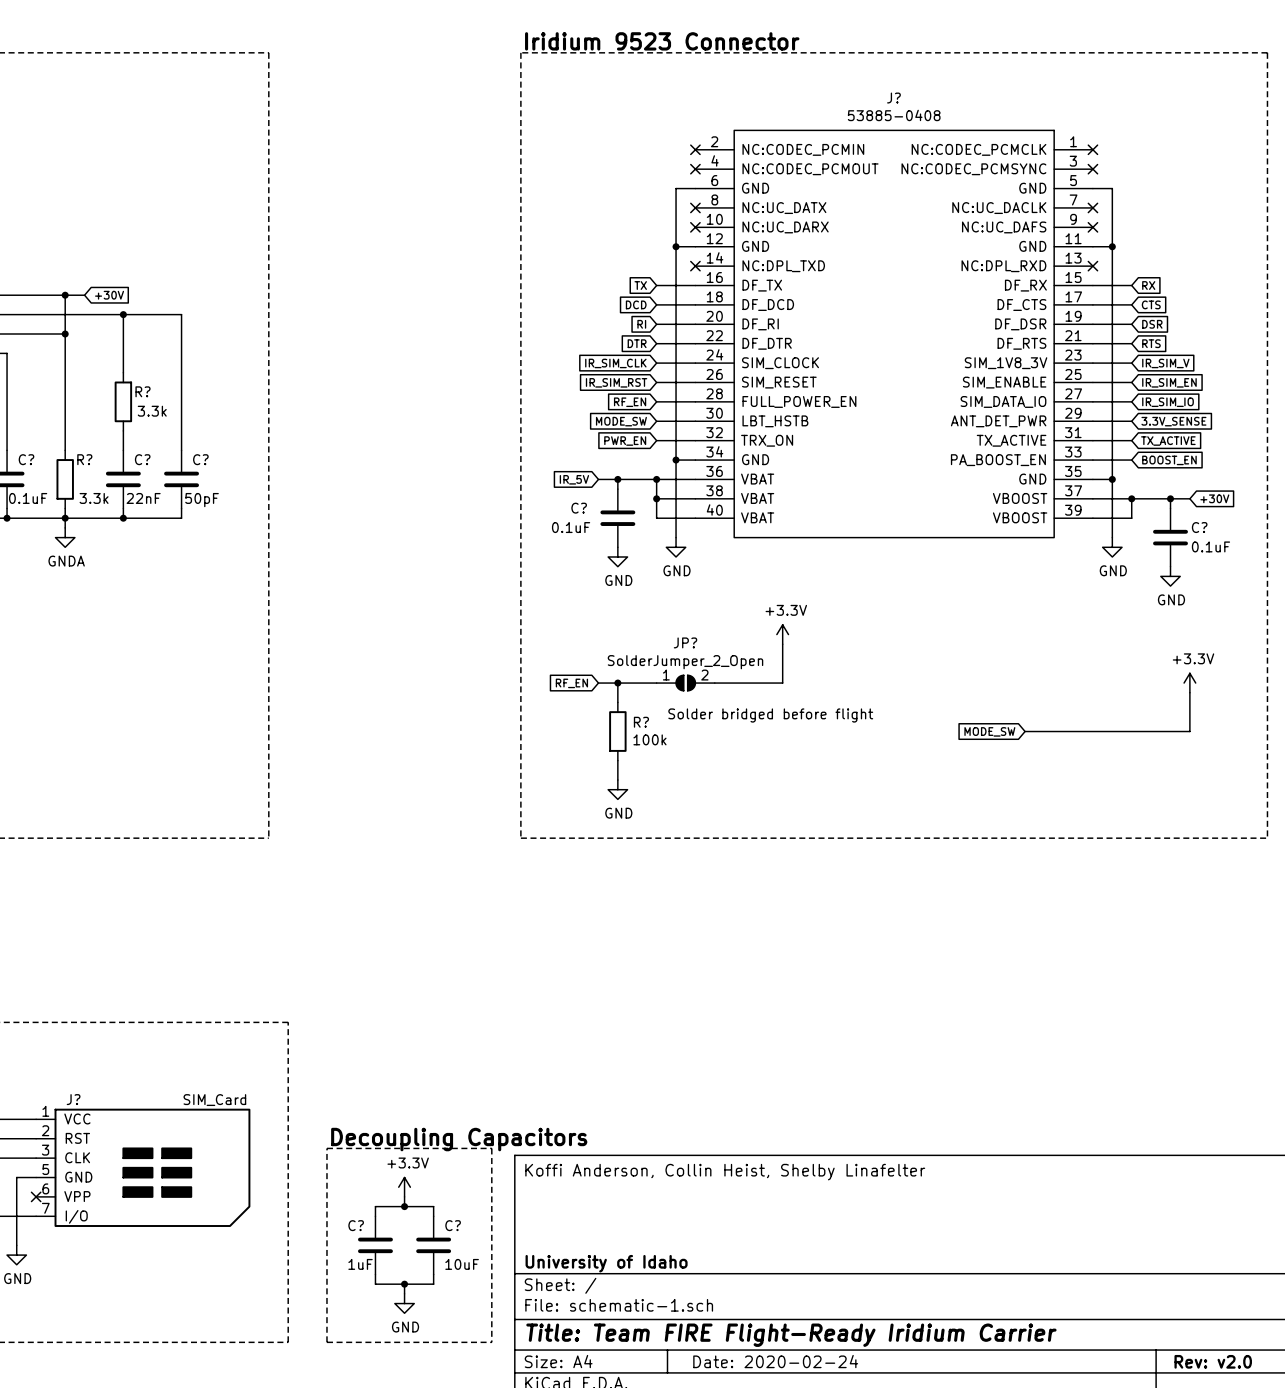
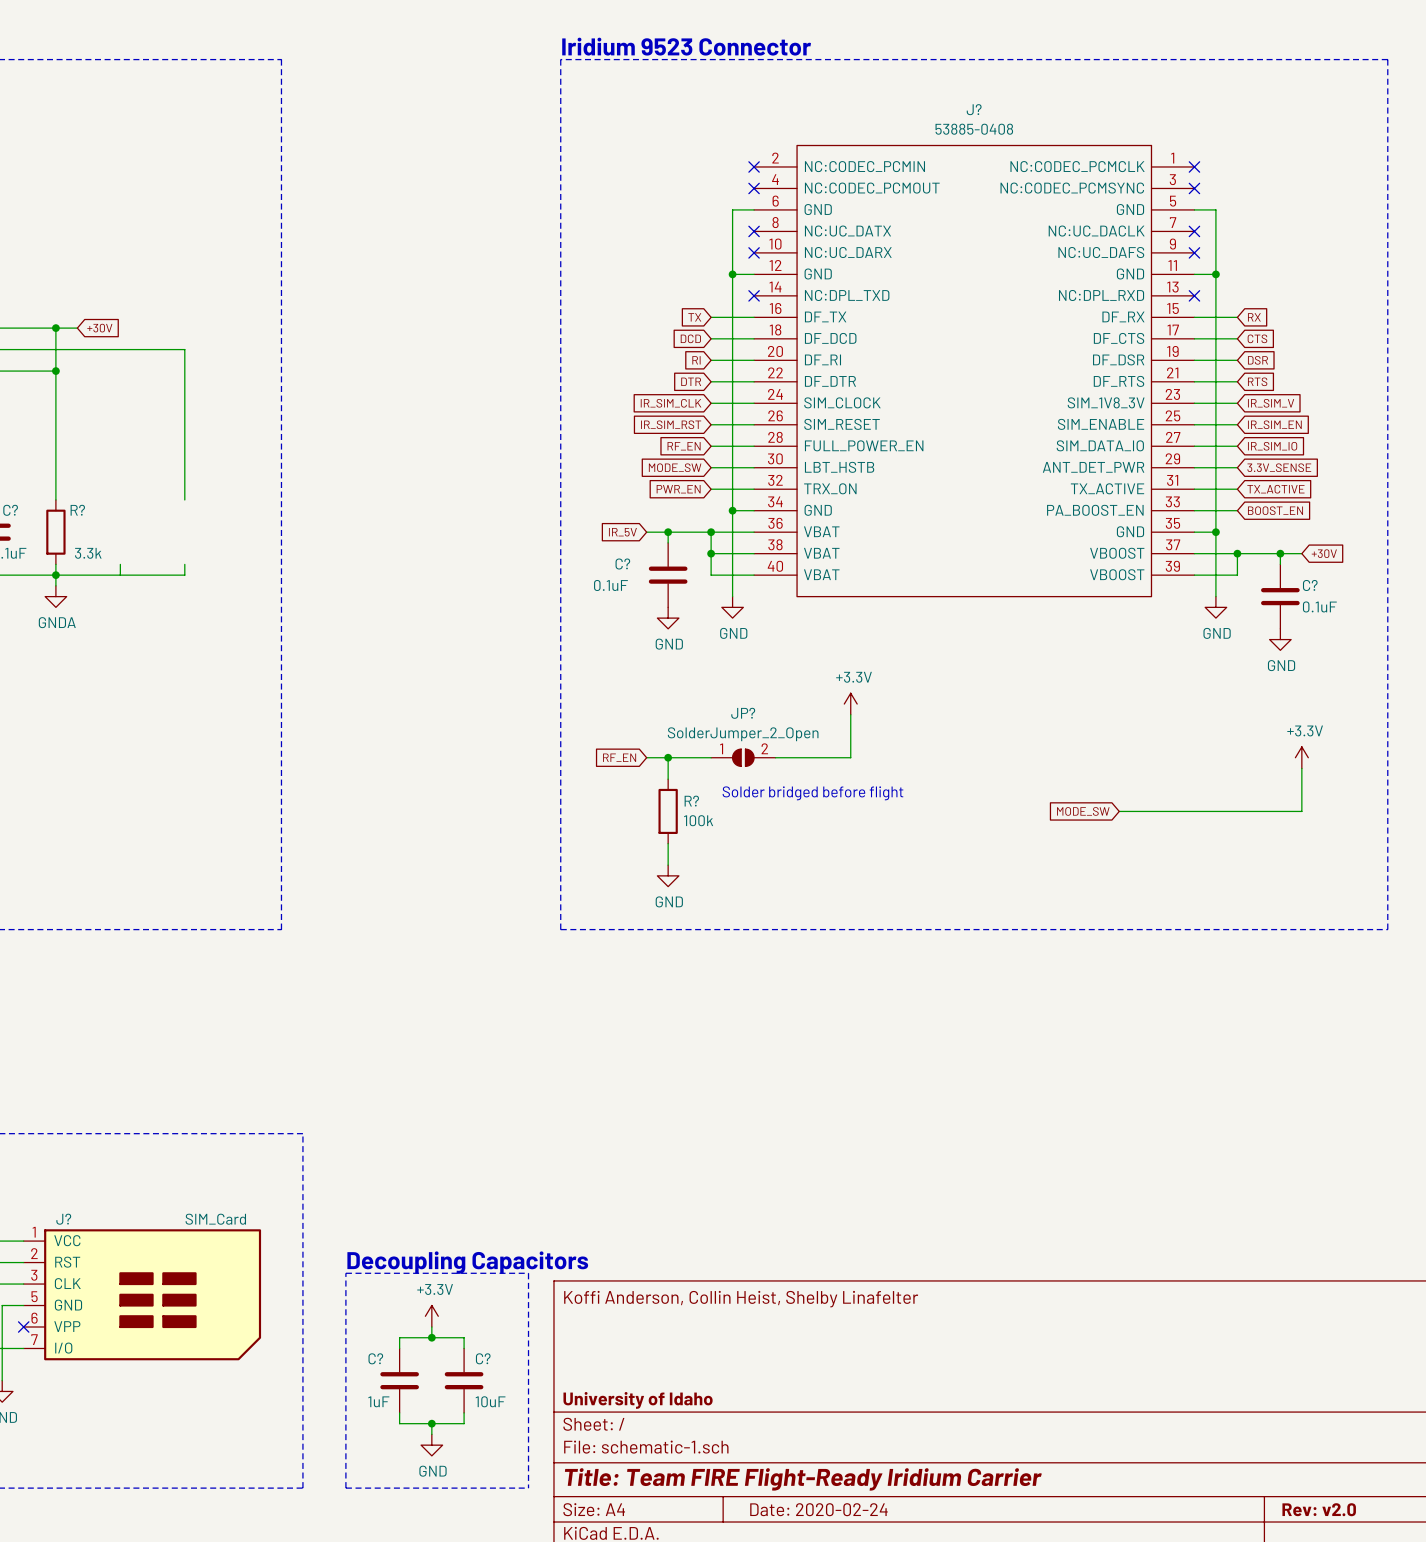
wire: (123, 314) (123, 372) -> none
junction: (123, 314) -> none
R?: 3.3k (123, 401) -> none
wire: (123, 430) (123, 450) -> none
C?: 22nF (123, 479) -> none
C?: 50pF (181, 479) -> none
junction: (123, 518) -> none

